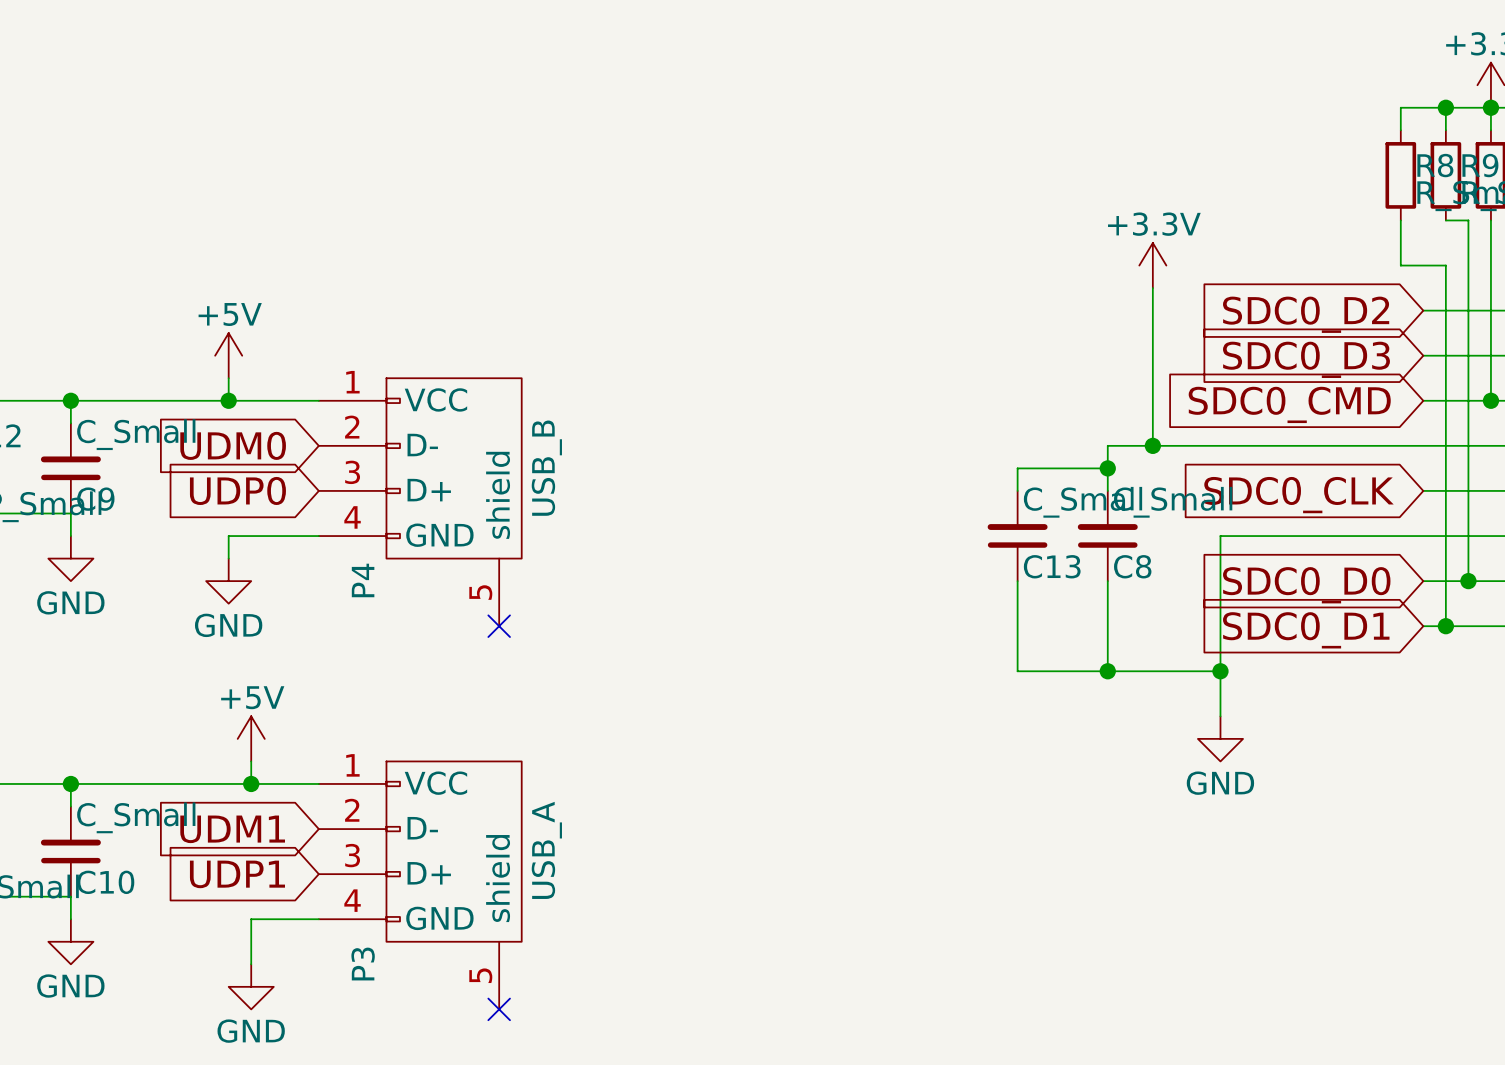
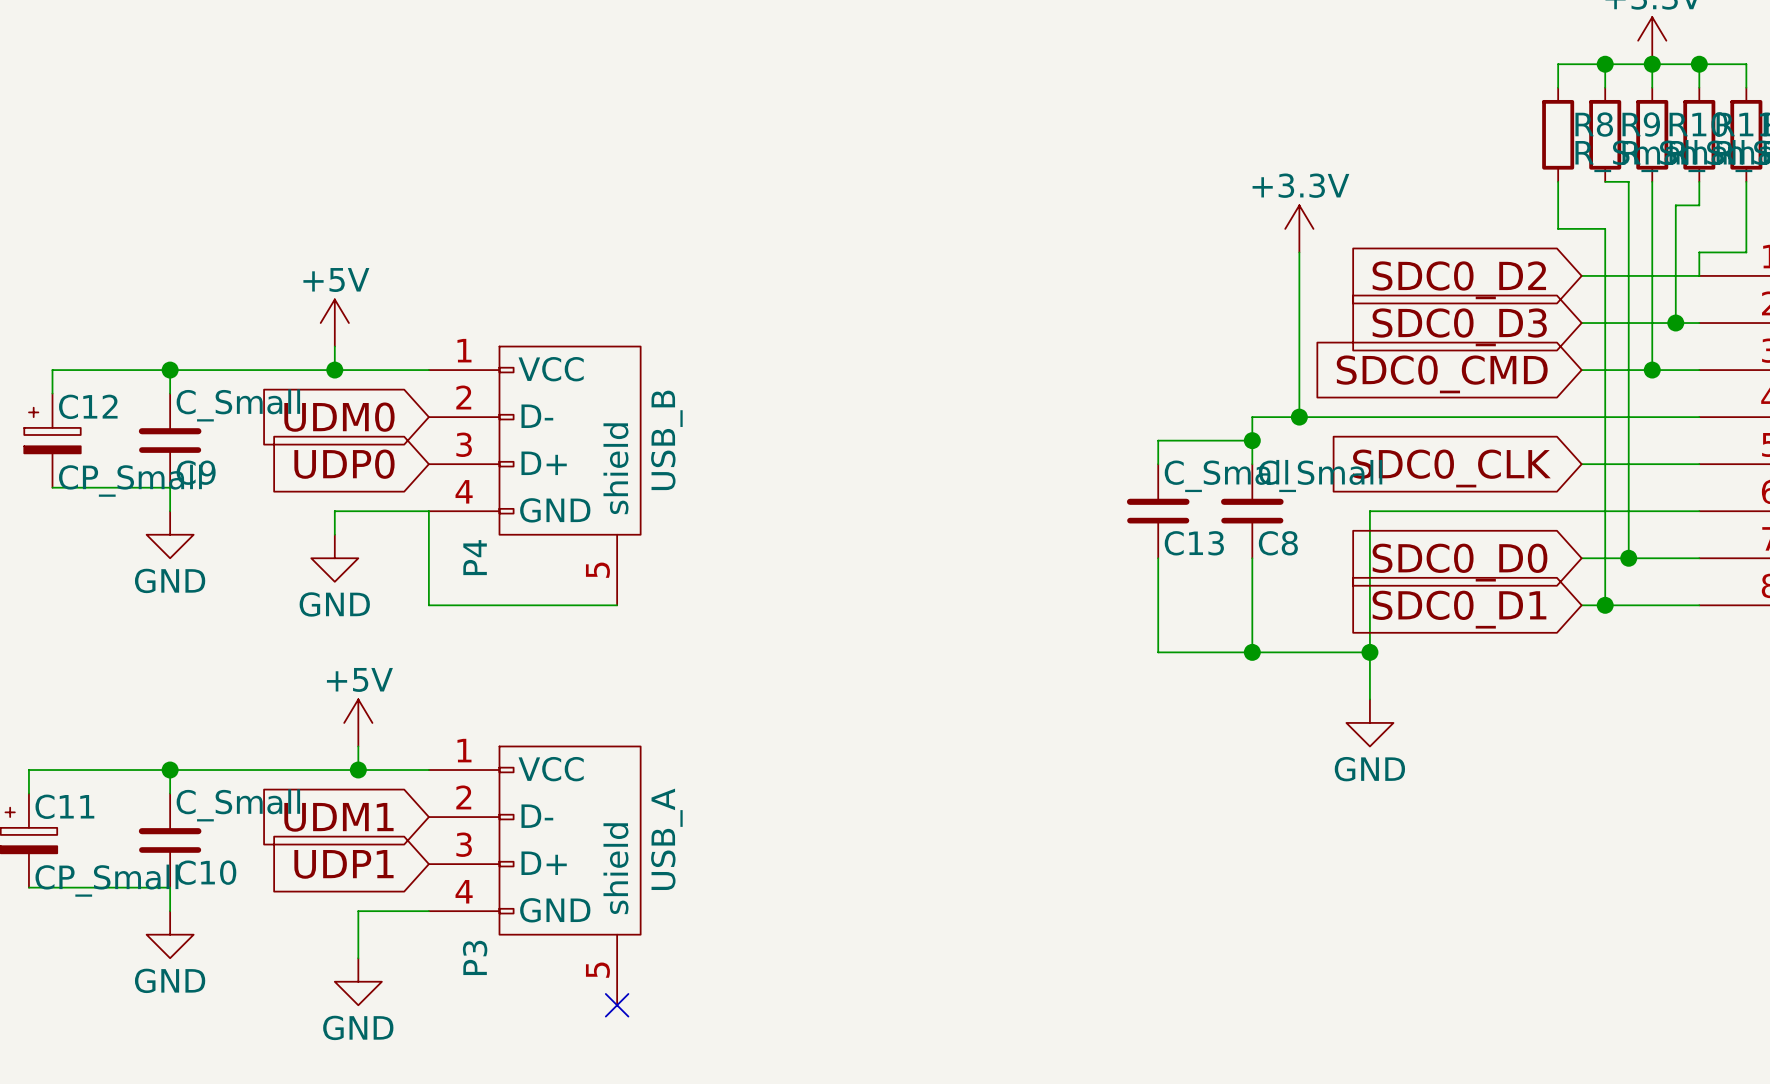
wire: none -> (428, 511) (428, 605) (617, 605)
no-connect mark: (499, 626) -> none

